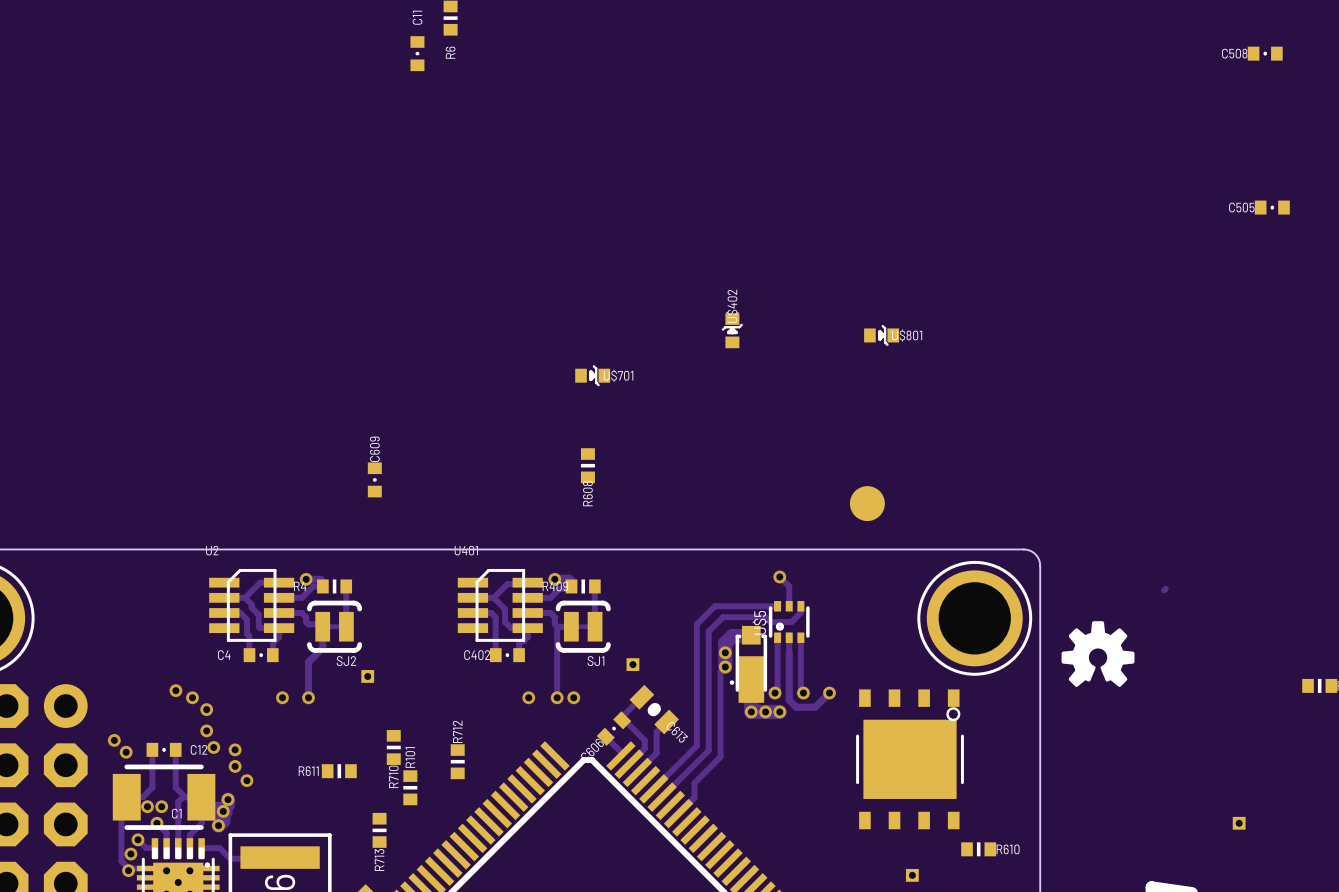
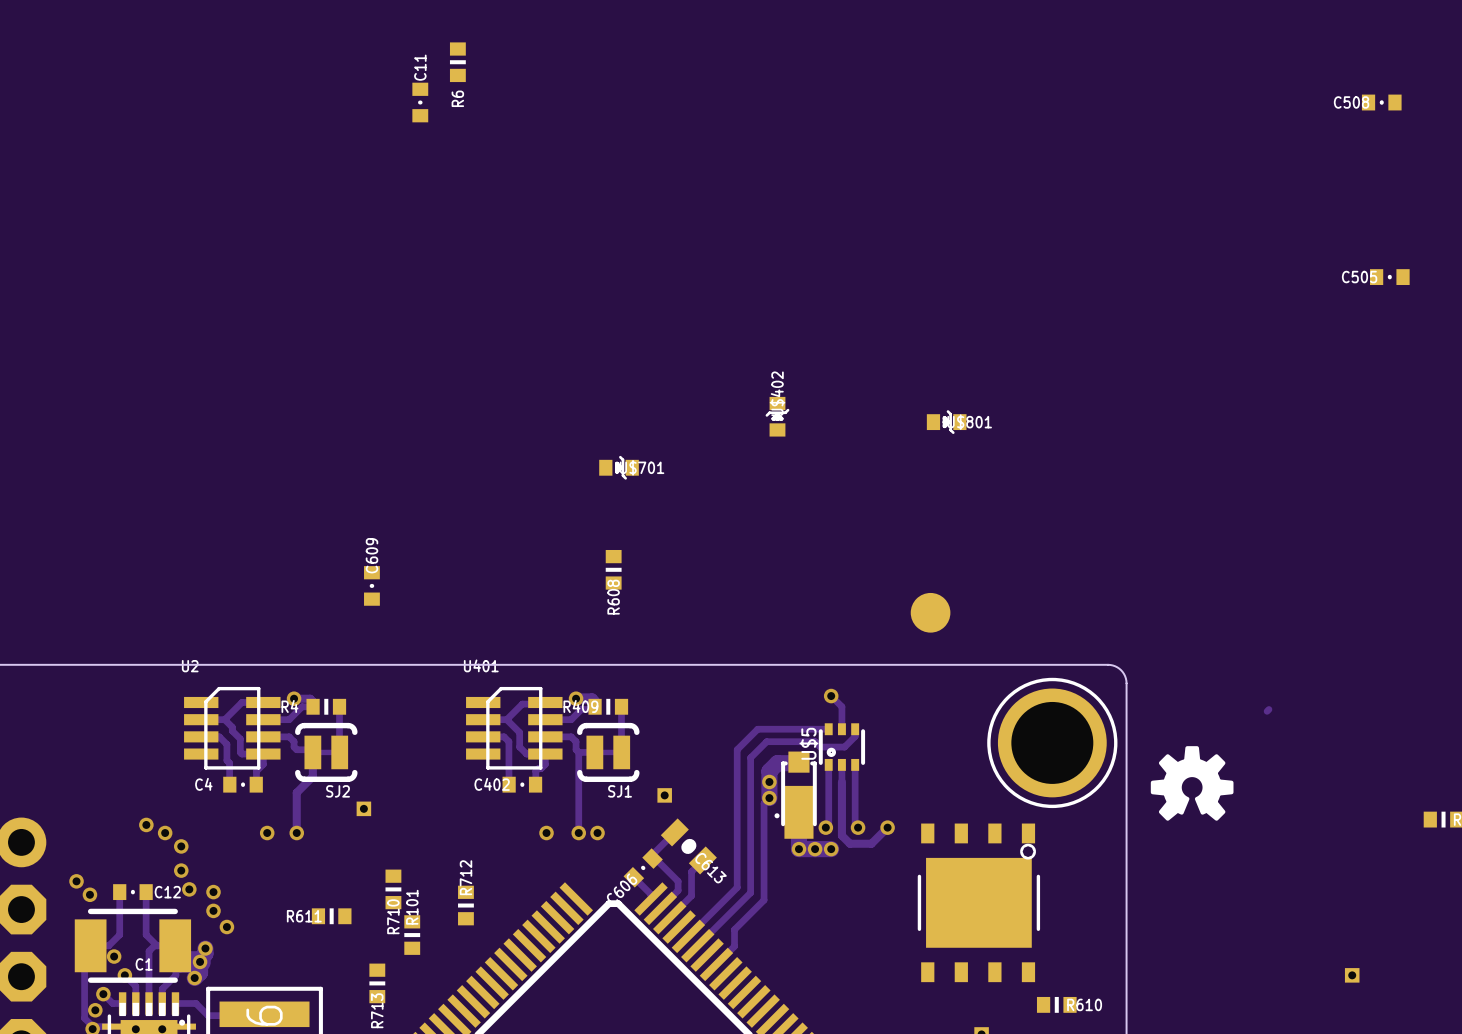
via: (161, 806) -> none

